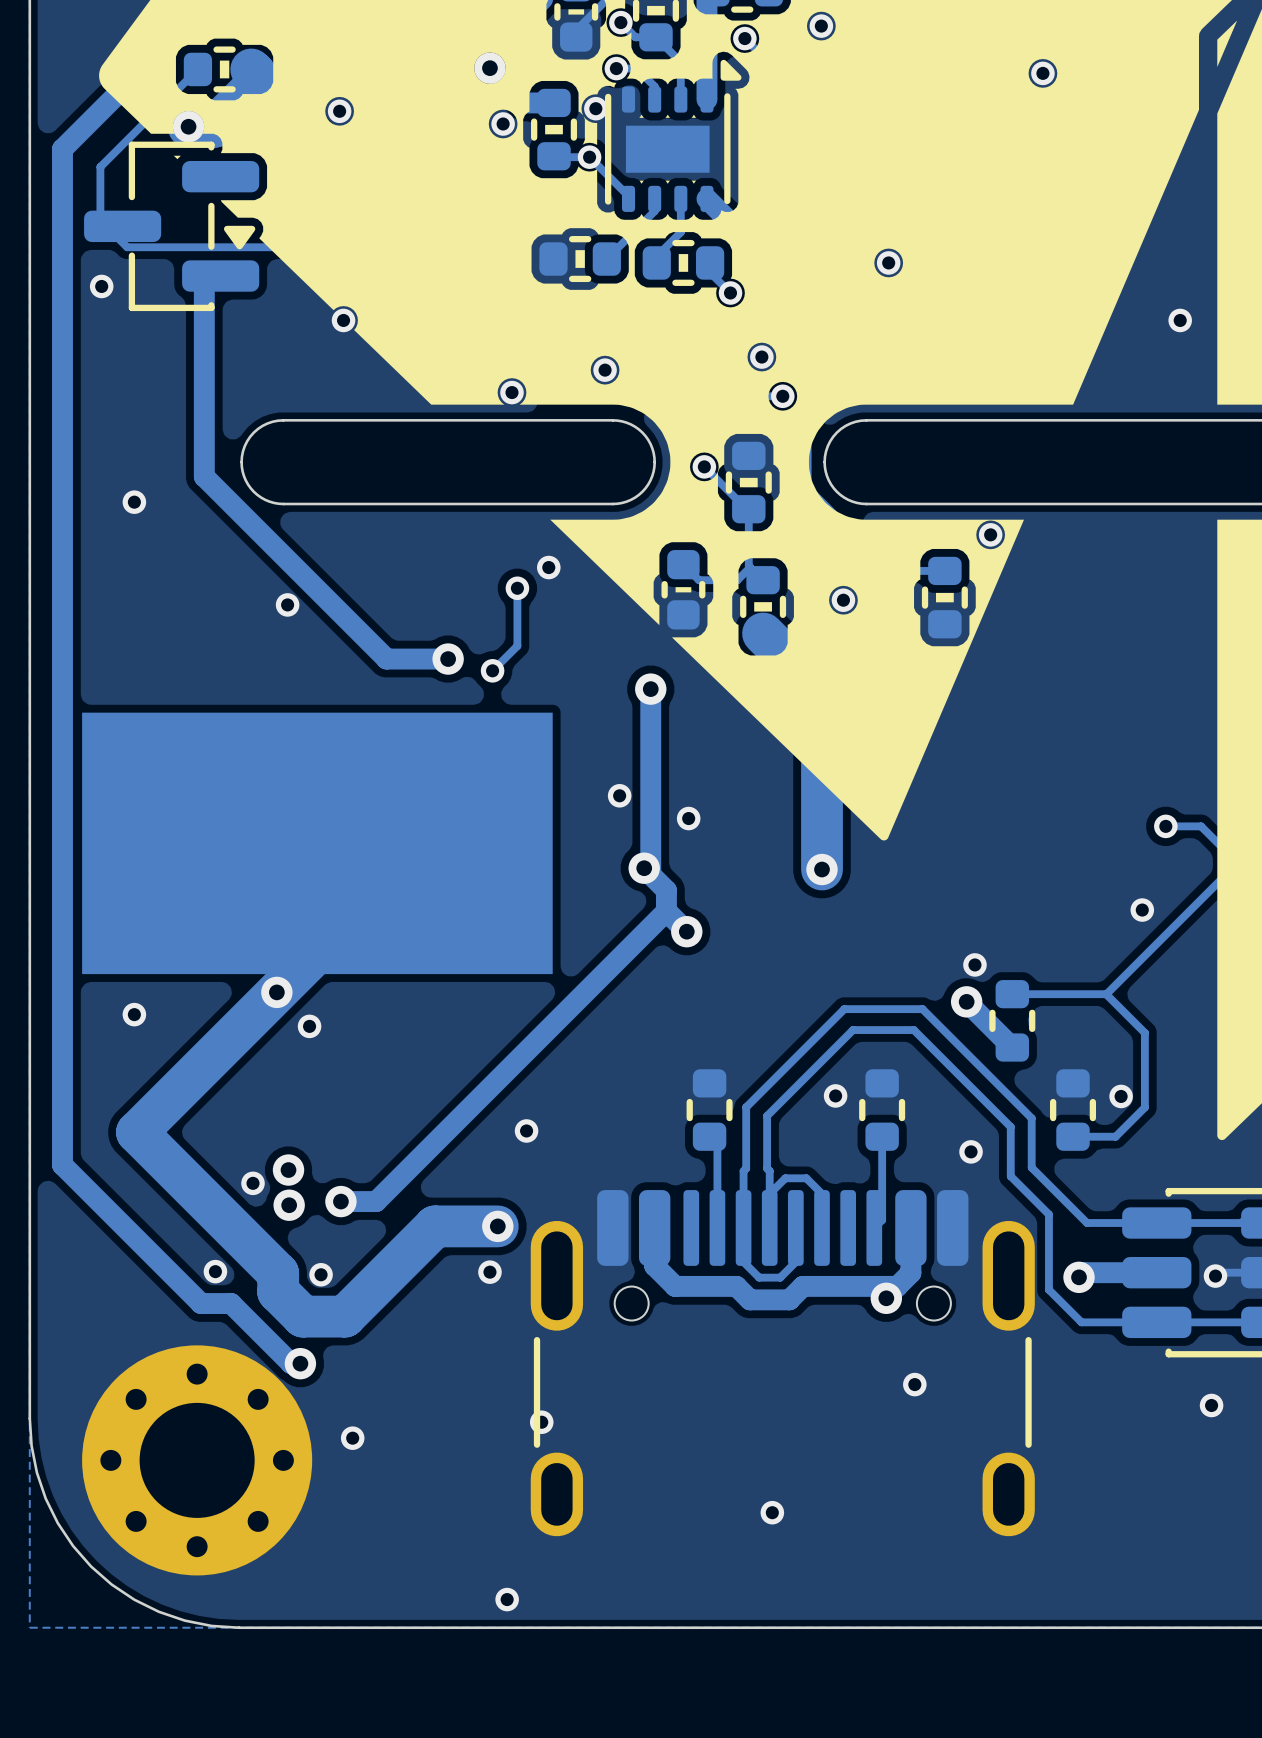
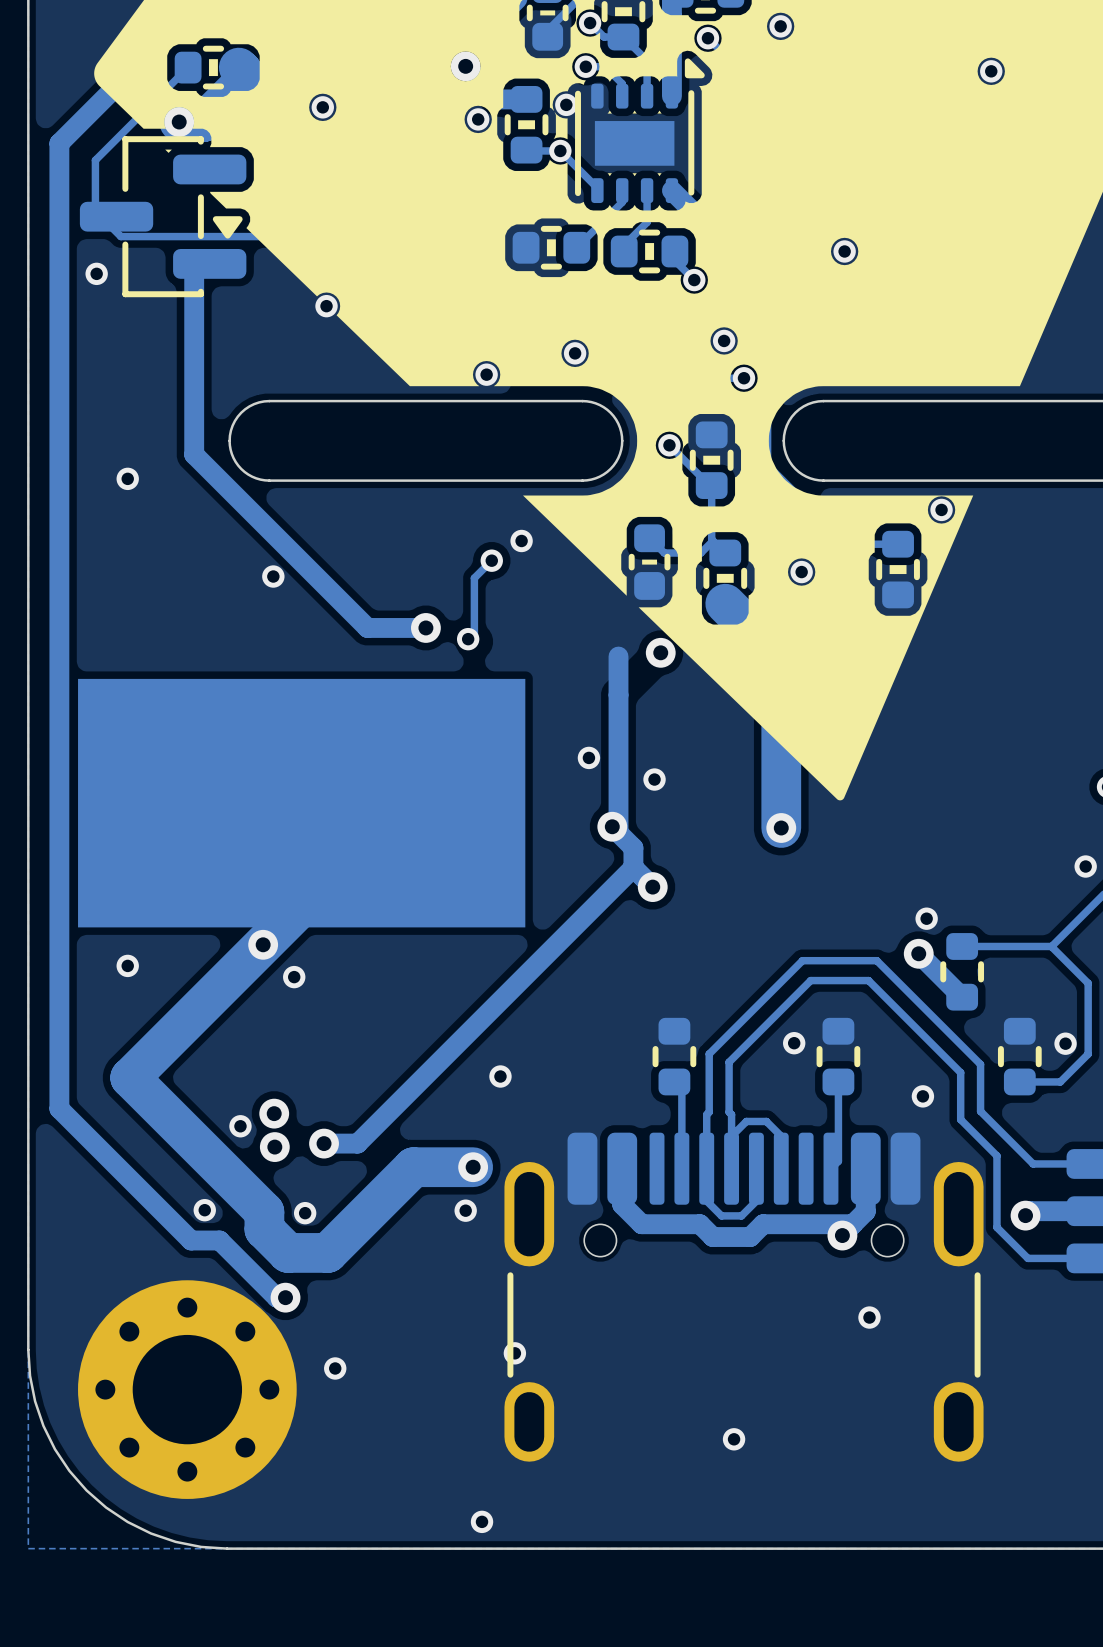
track: (517, 588) (517, 645) (492, 670) -> (491, 560) (474, 578) (474, 641)
via position: (650, 689) -> (660, 652)

